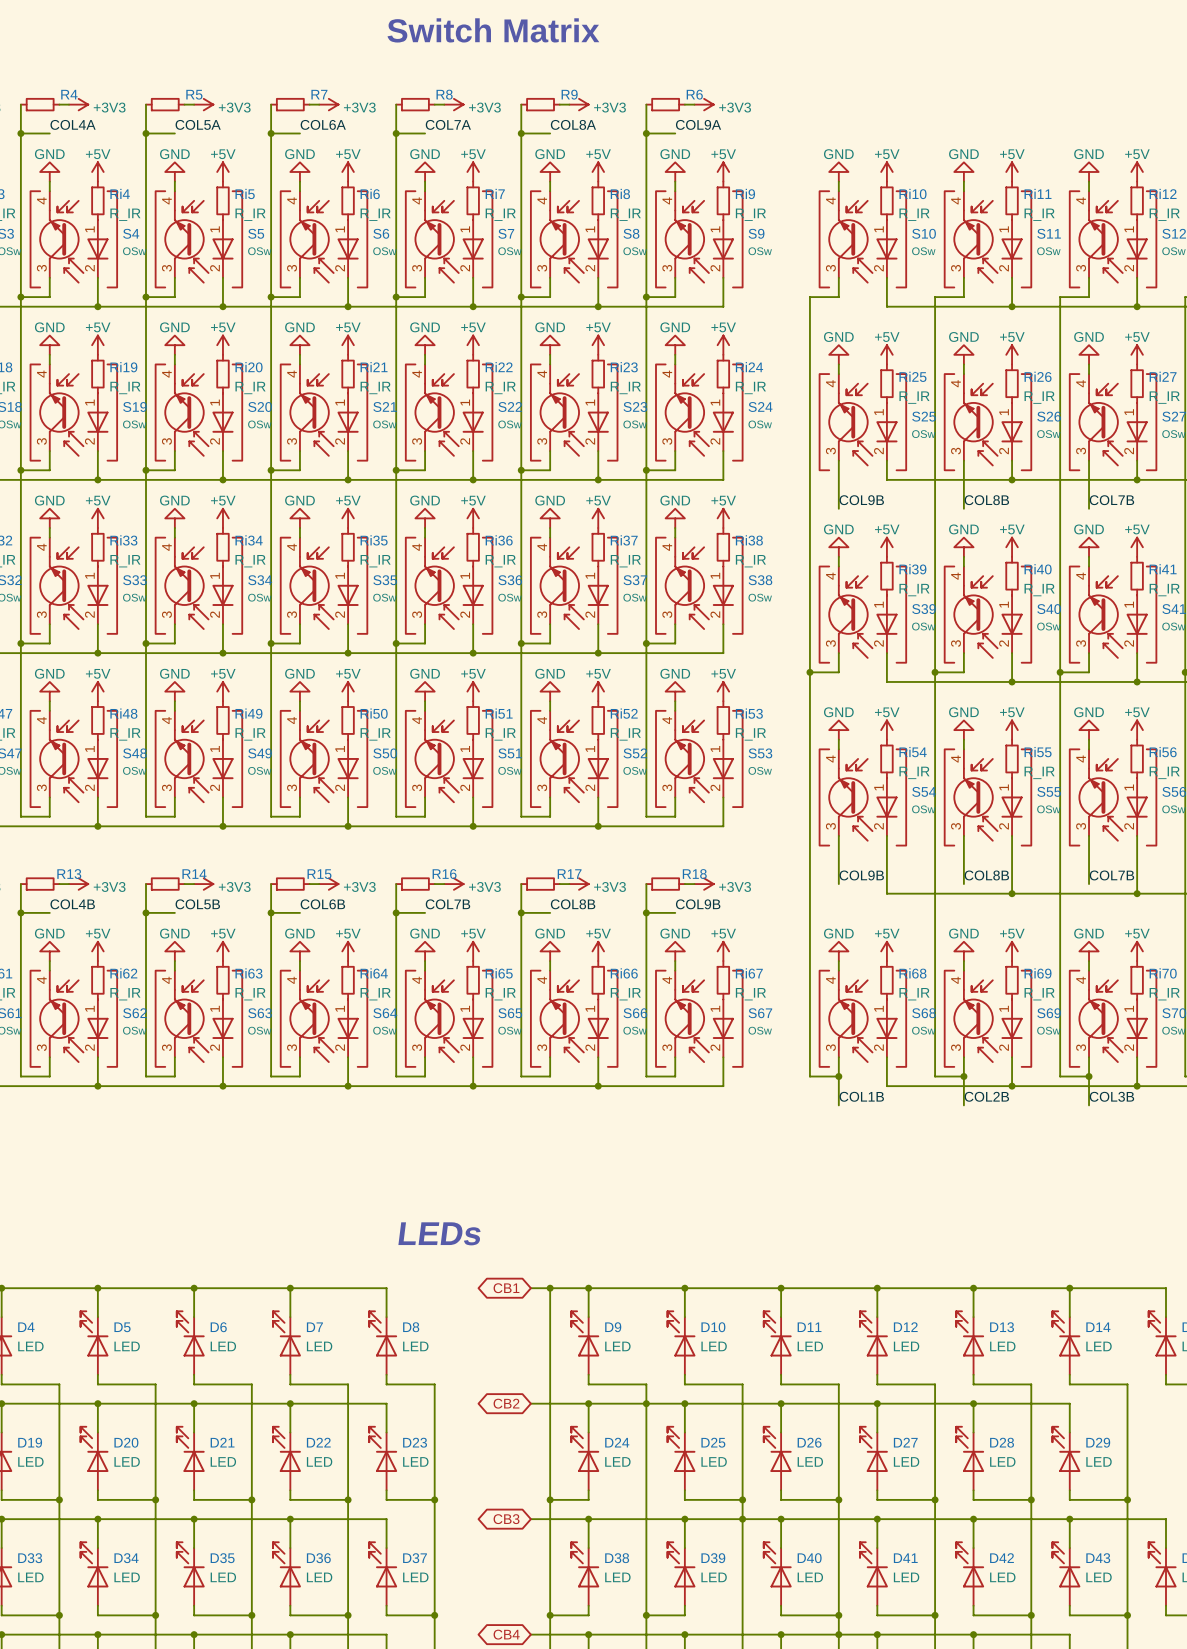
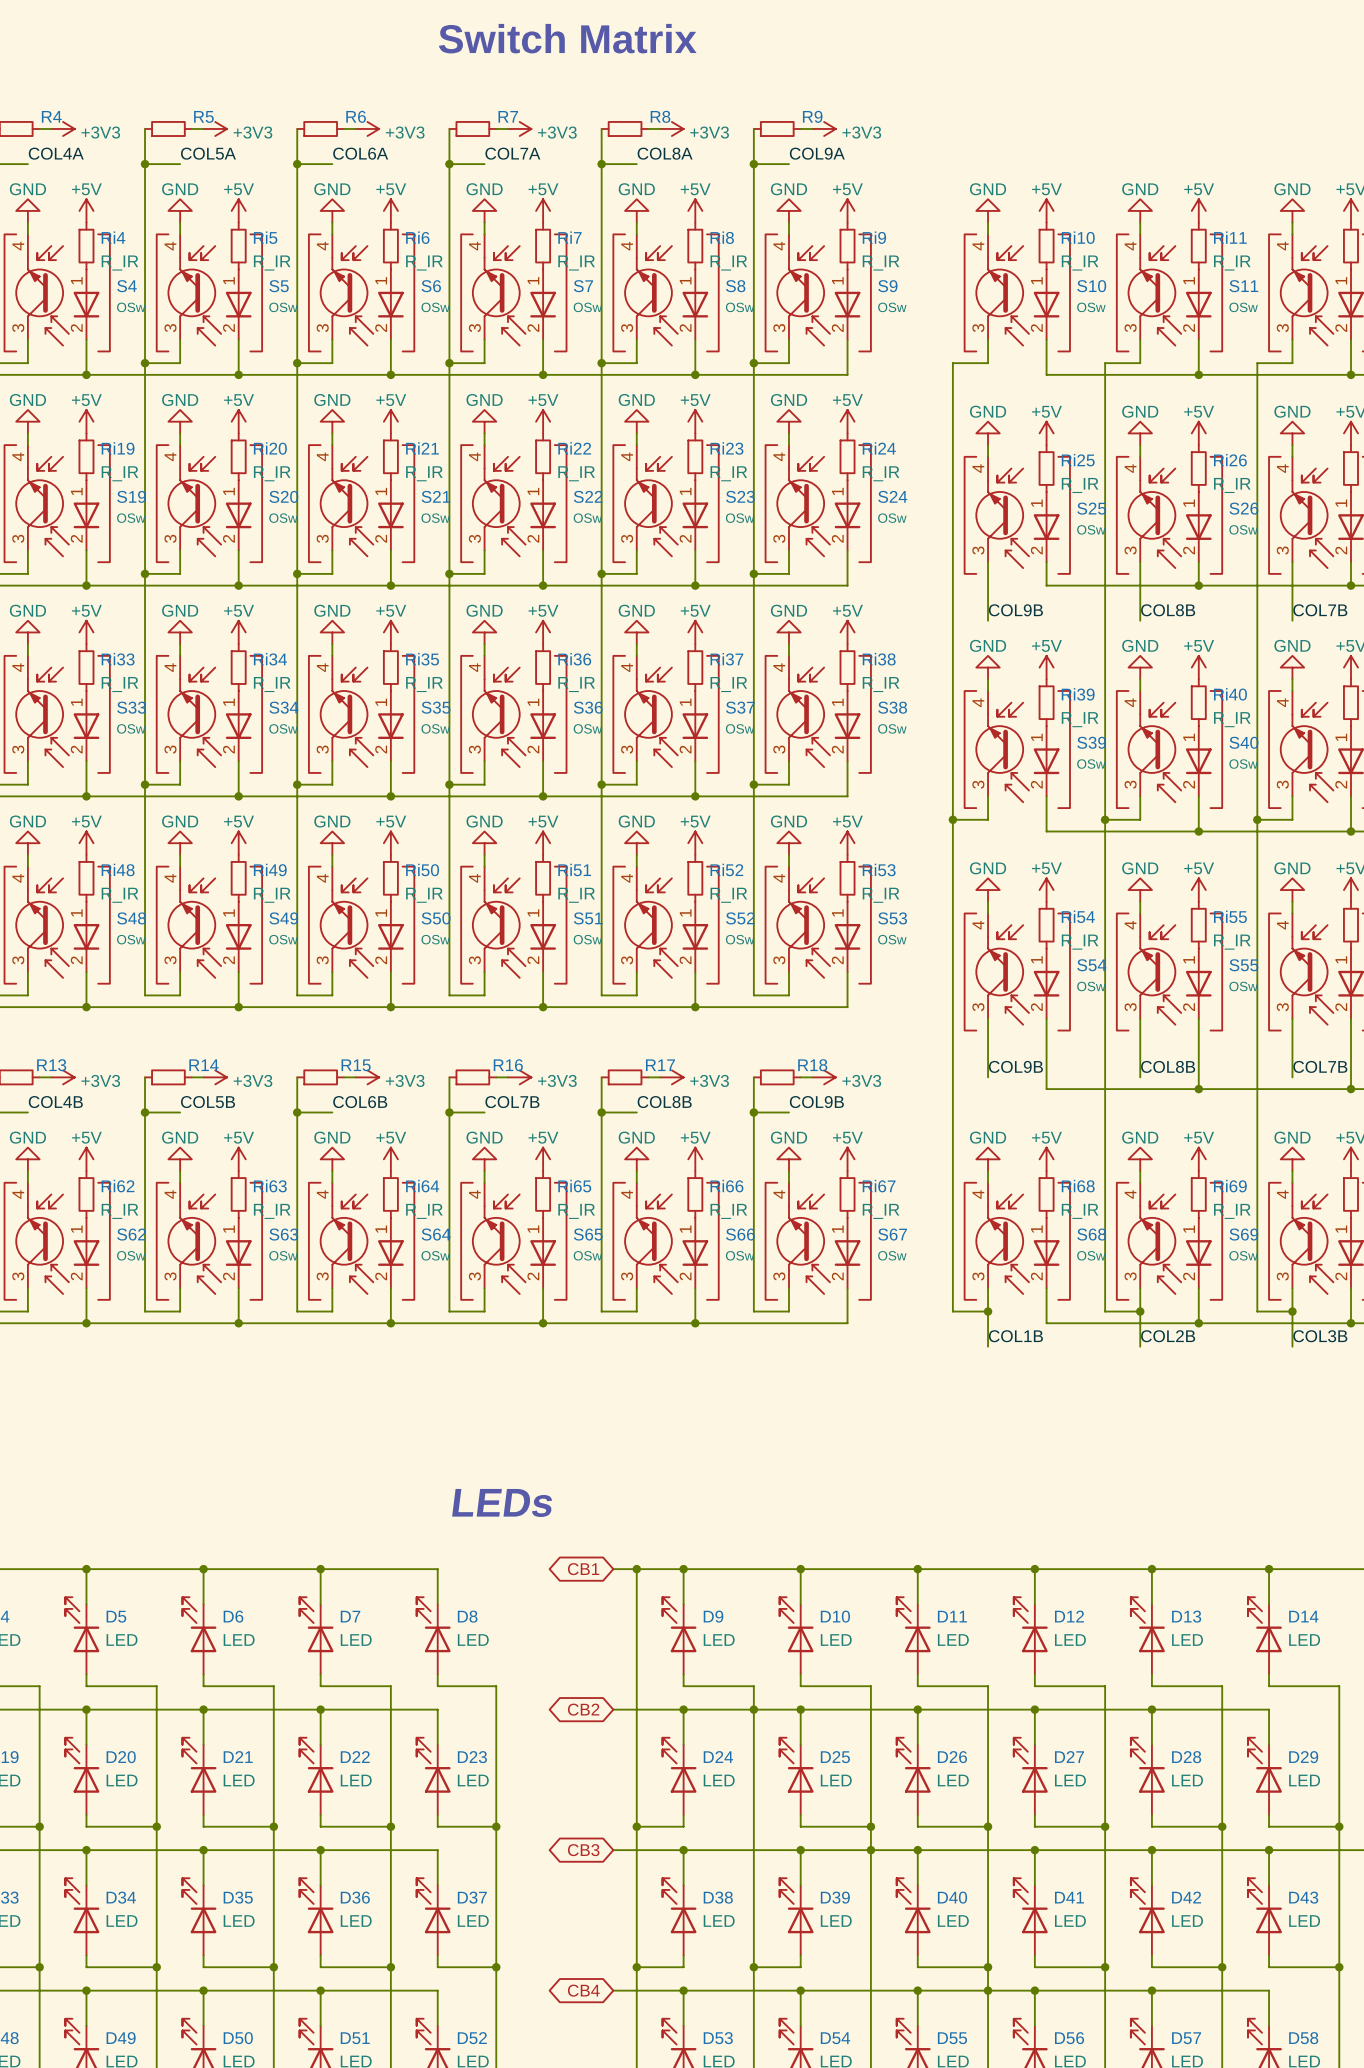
R7 name: R7 (319, 94) -> R6 (356, 116)
R8 name: R8 (444, 94) -> R7 (508, 116)
R9 name: R9 (569, 94) -> R8 (660, 116)
R6 name: R6 (694, 94) -> R9 (812, 116)

